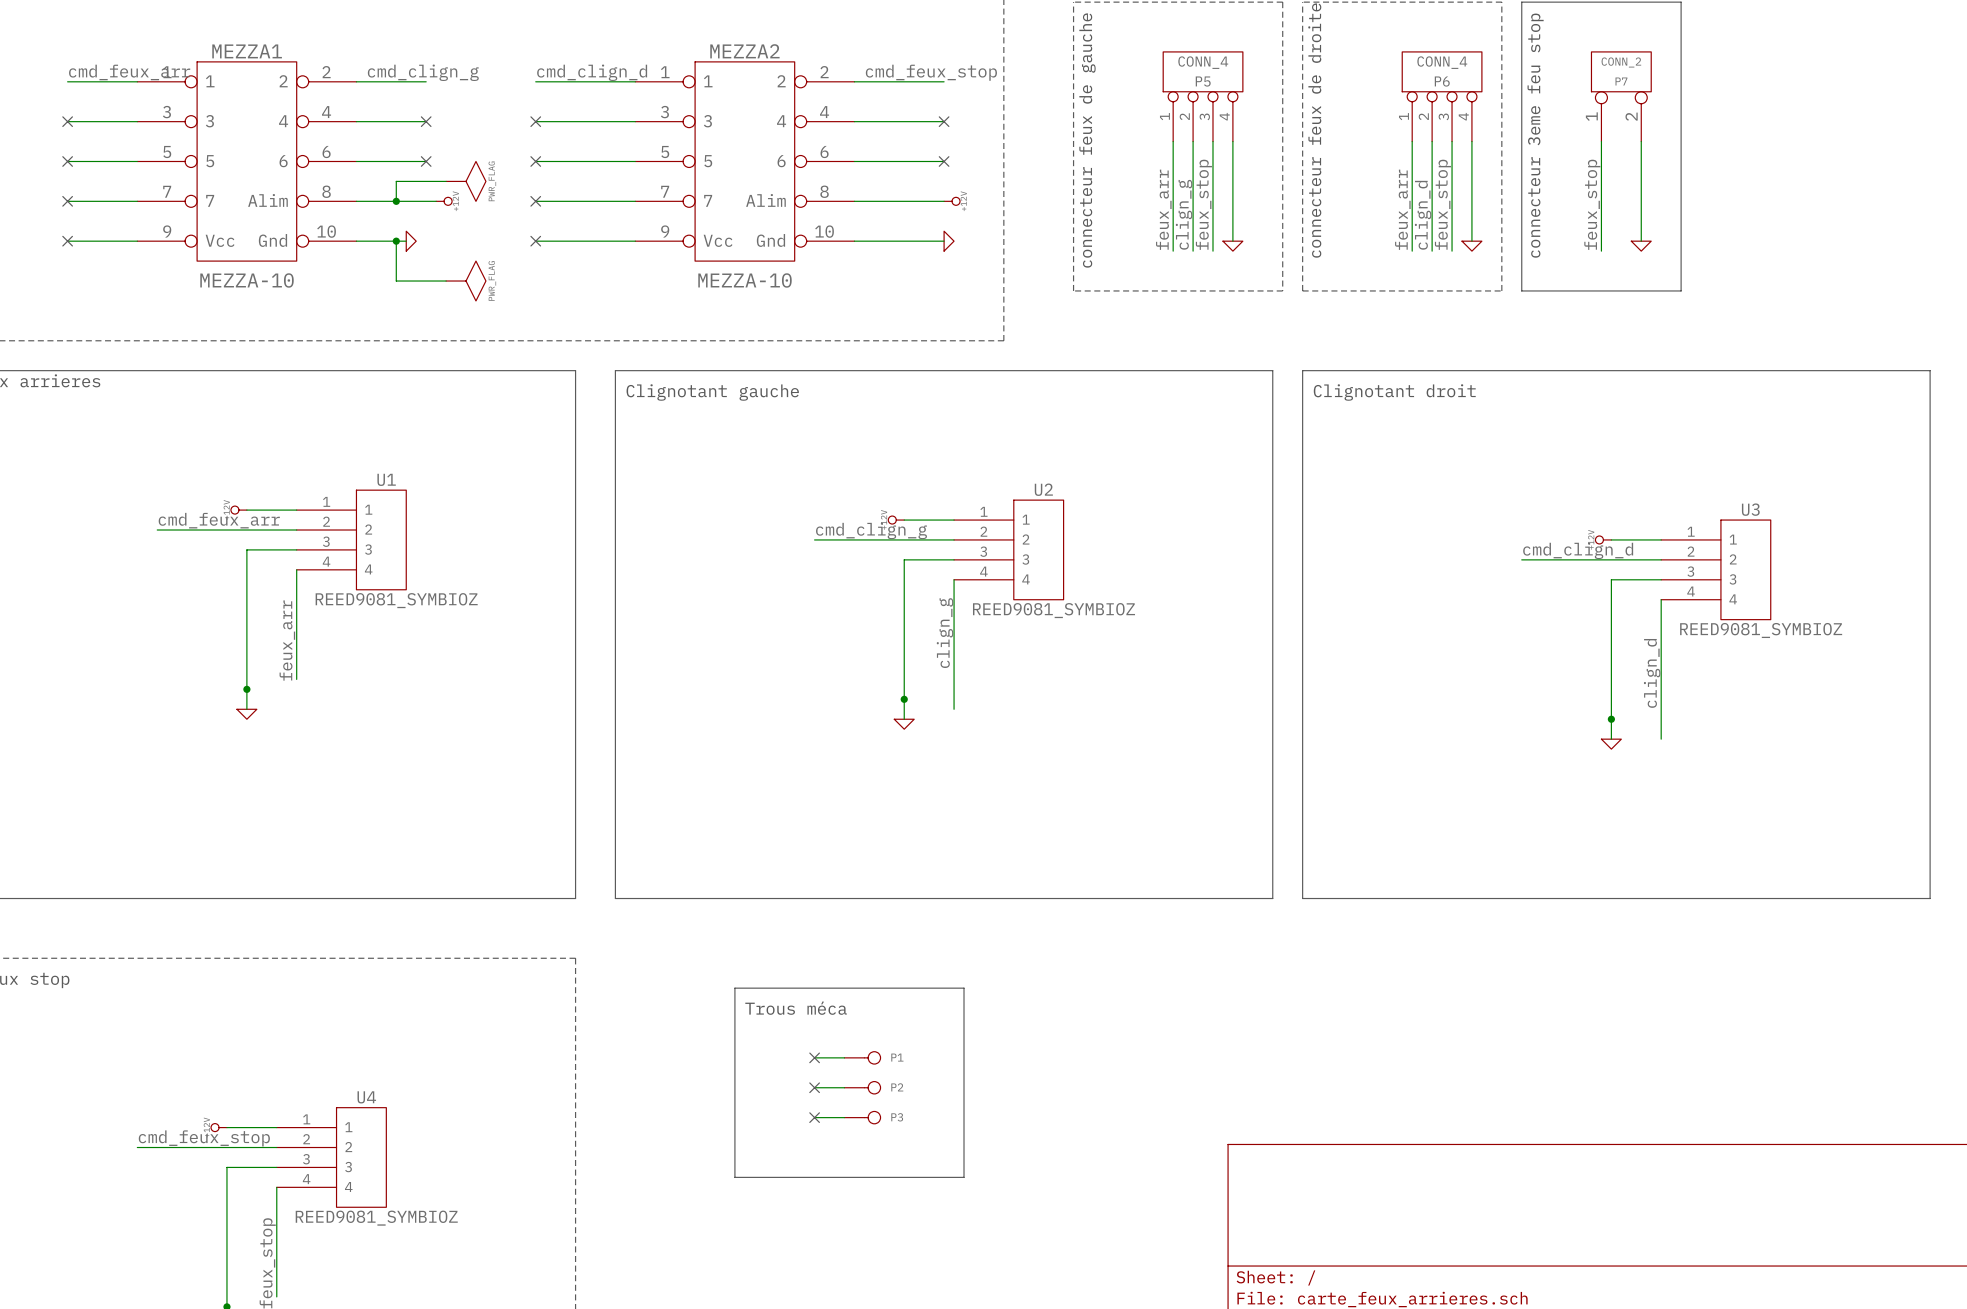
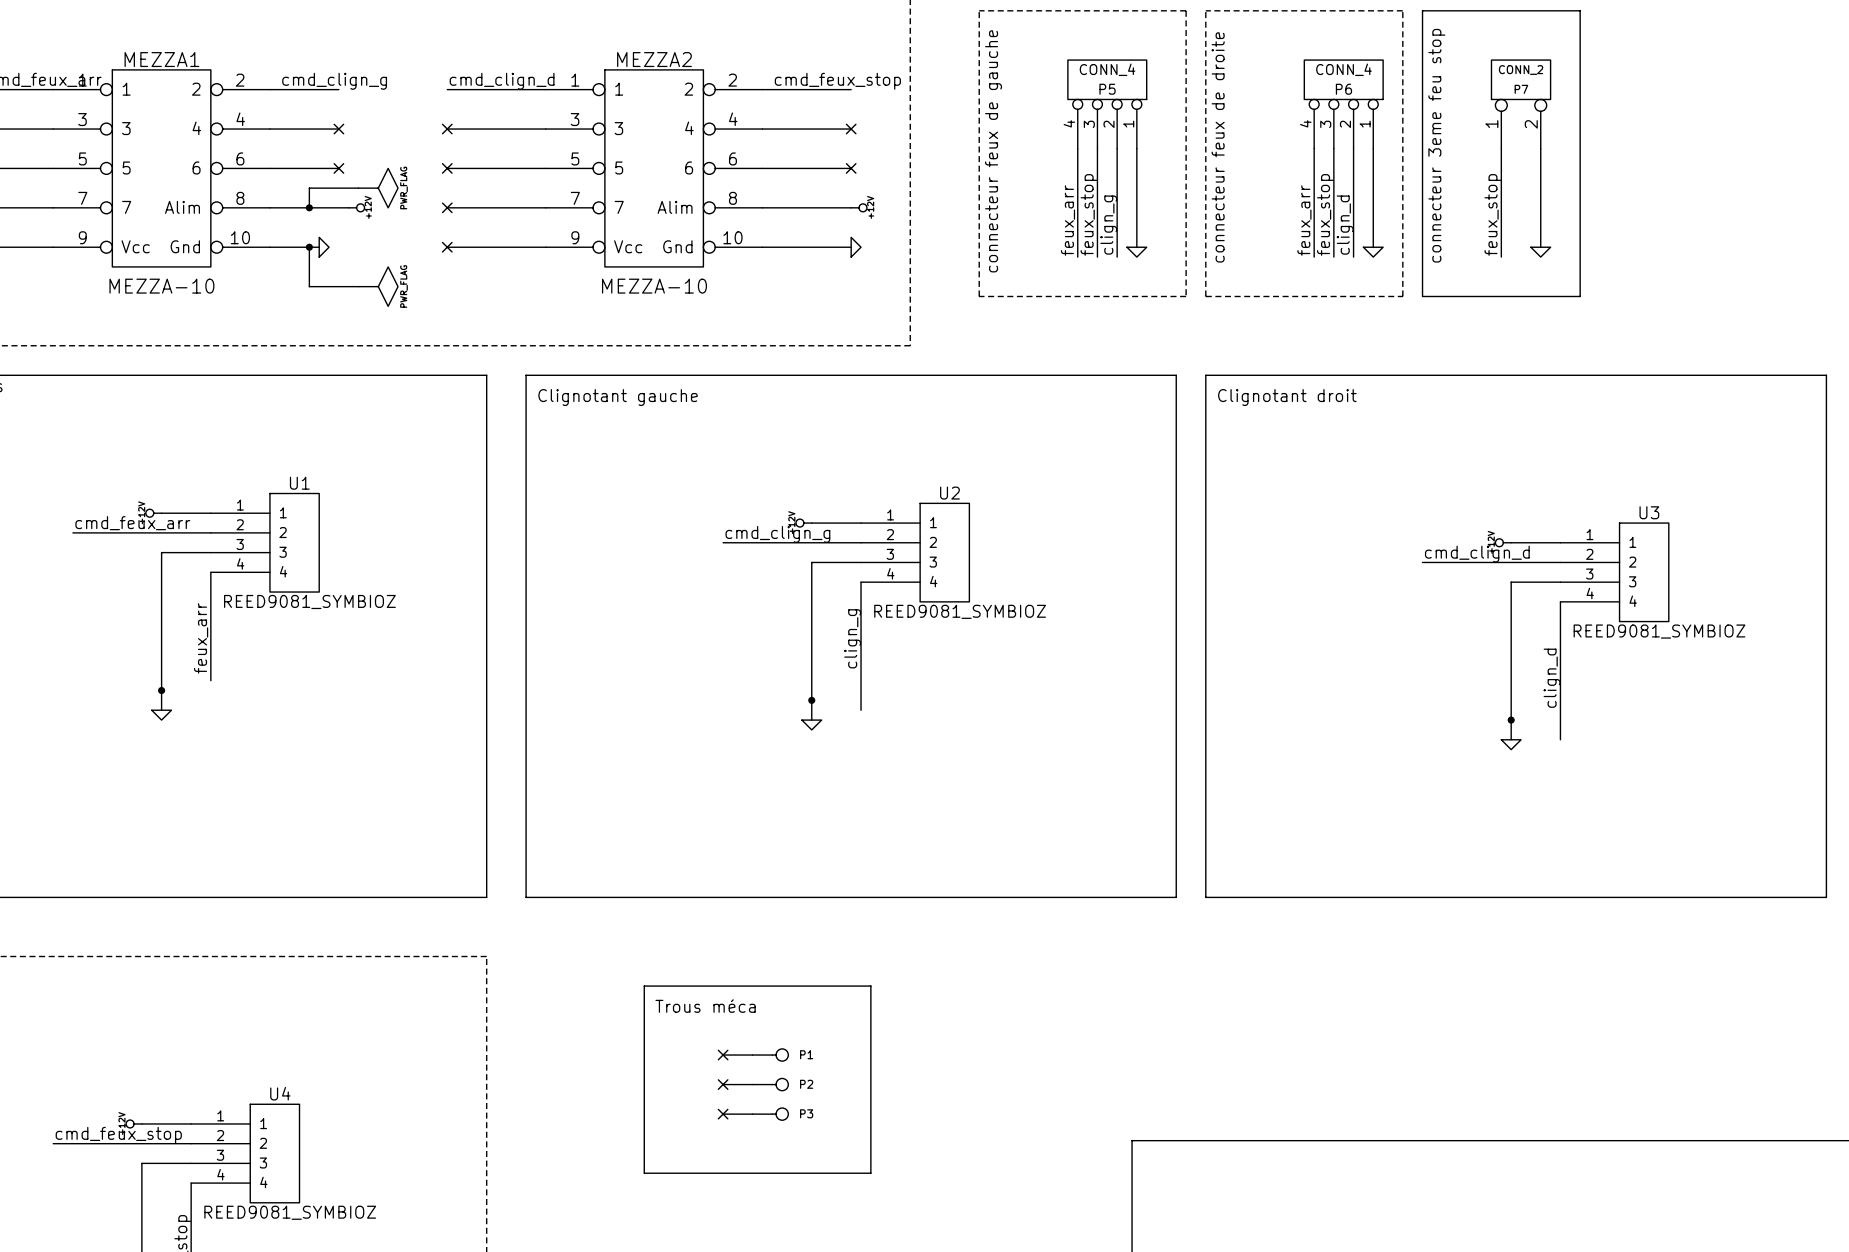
P5 flip: as is (1203, 71) -> left-right (1107, 79)
P6 flip: as is (1442, 71) -> left-right (1343, 79)
label: feux_stop (1203, 204) -> clign_g (1108, 225)
label: feux_stop (1442, 204) -> clign_d (1345, 225)
label: clign_g (1184, 214) -> feux_stop (1089, 214)
label: clign_d (1423, 215) -> feux_stop (1325, 214)

